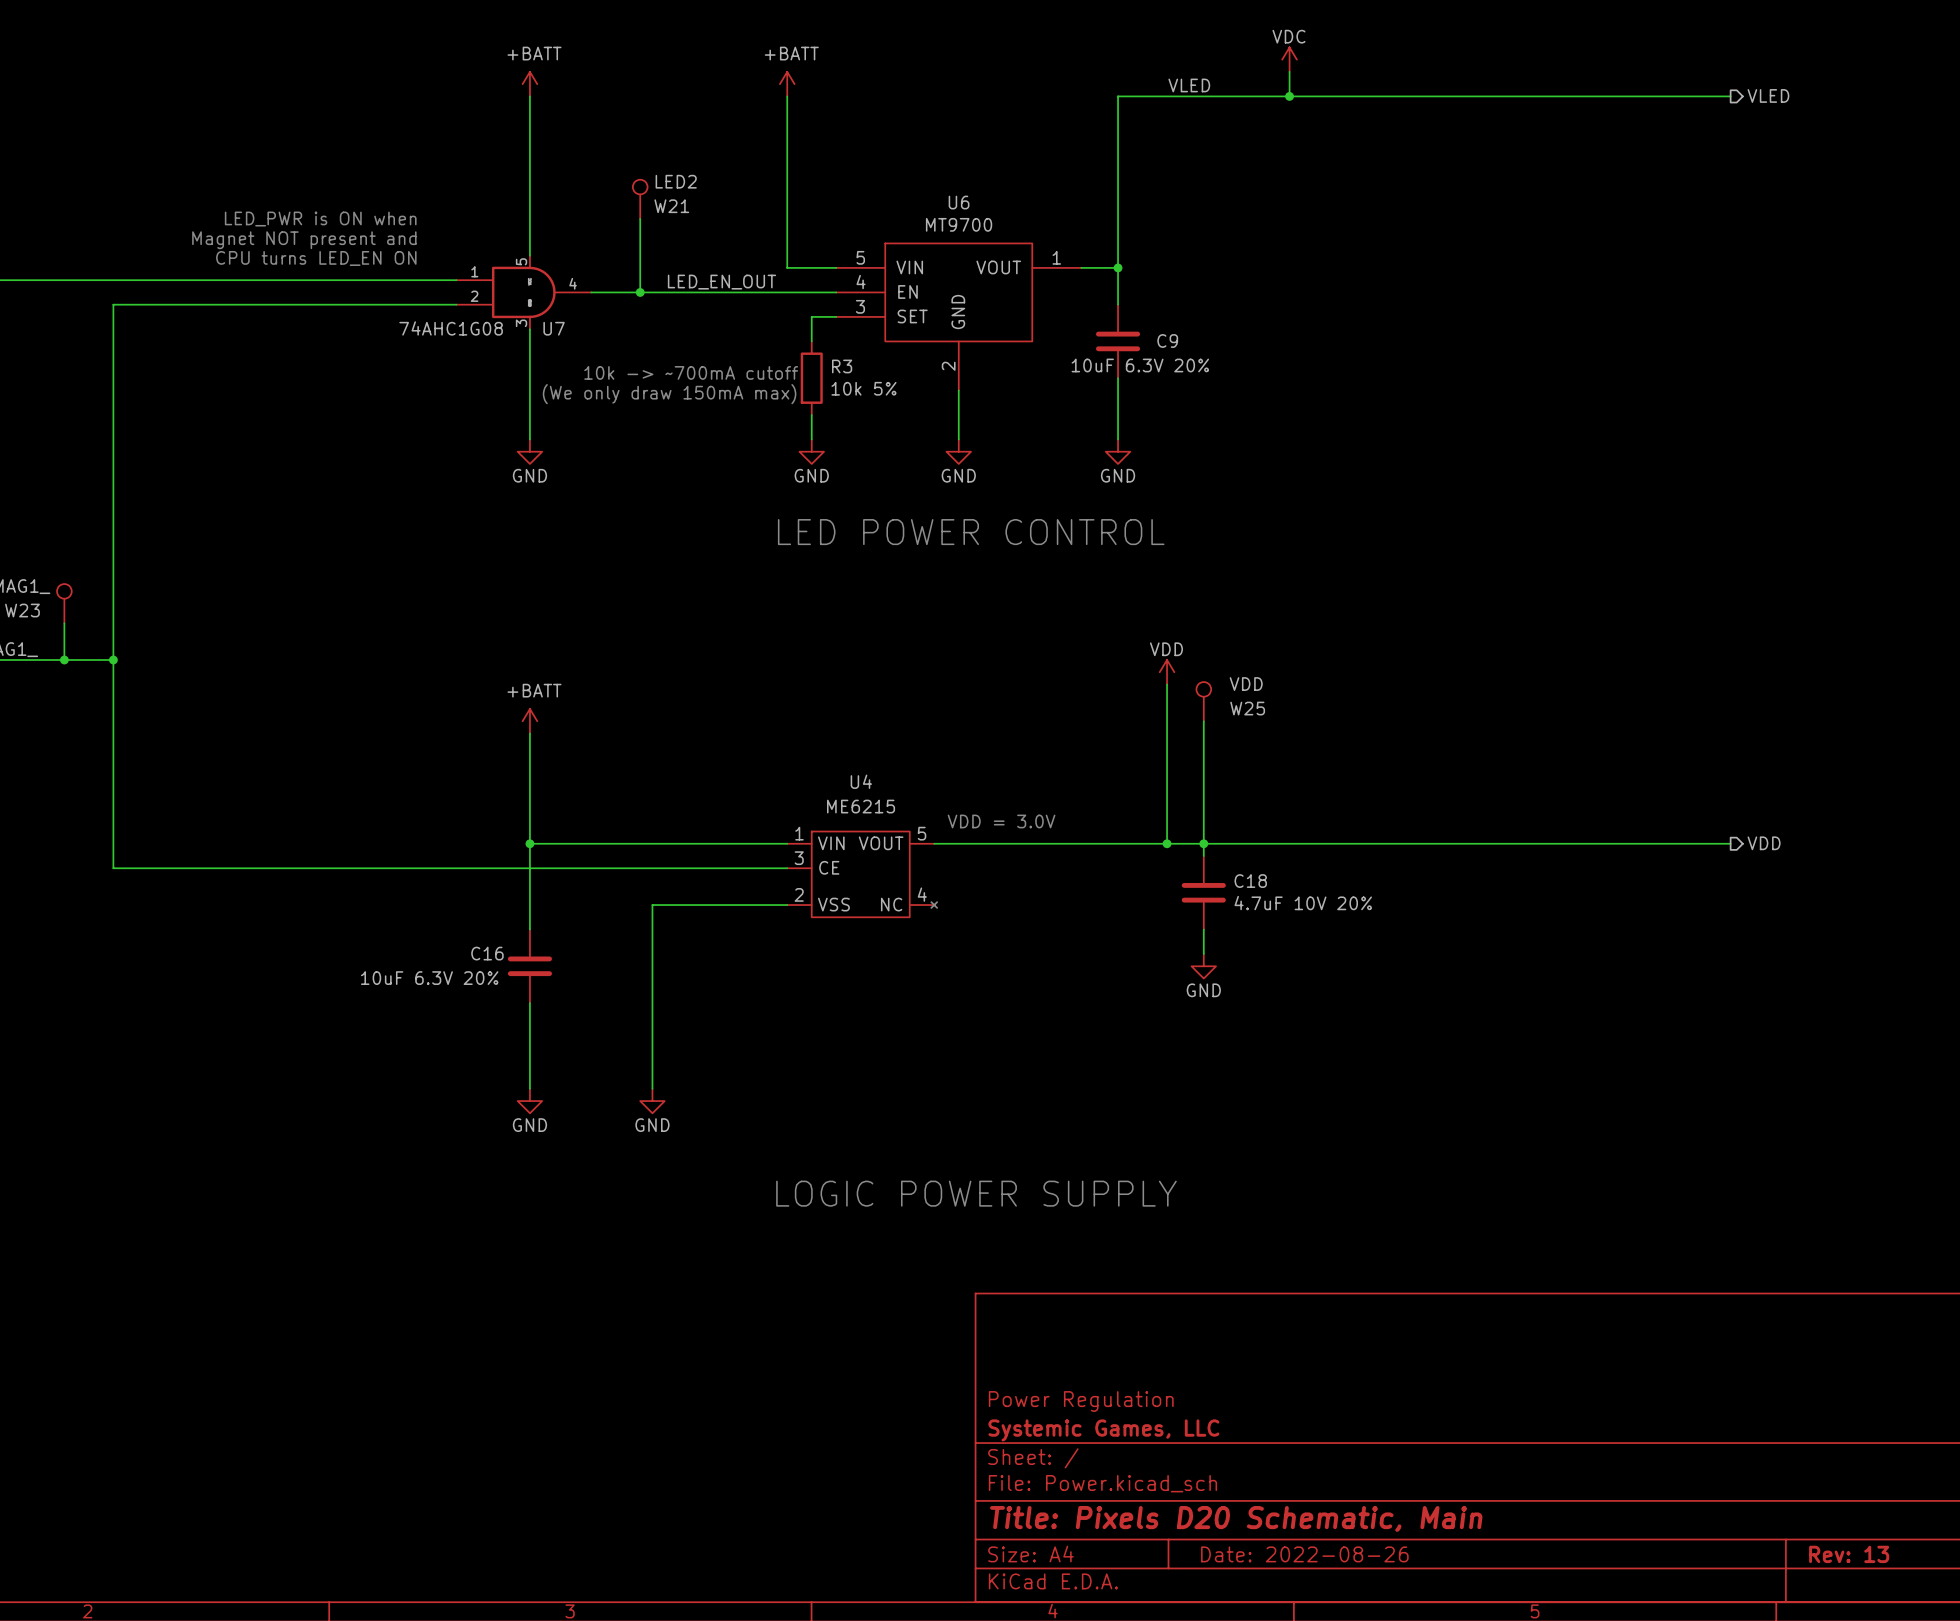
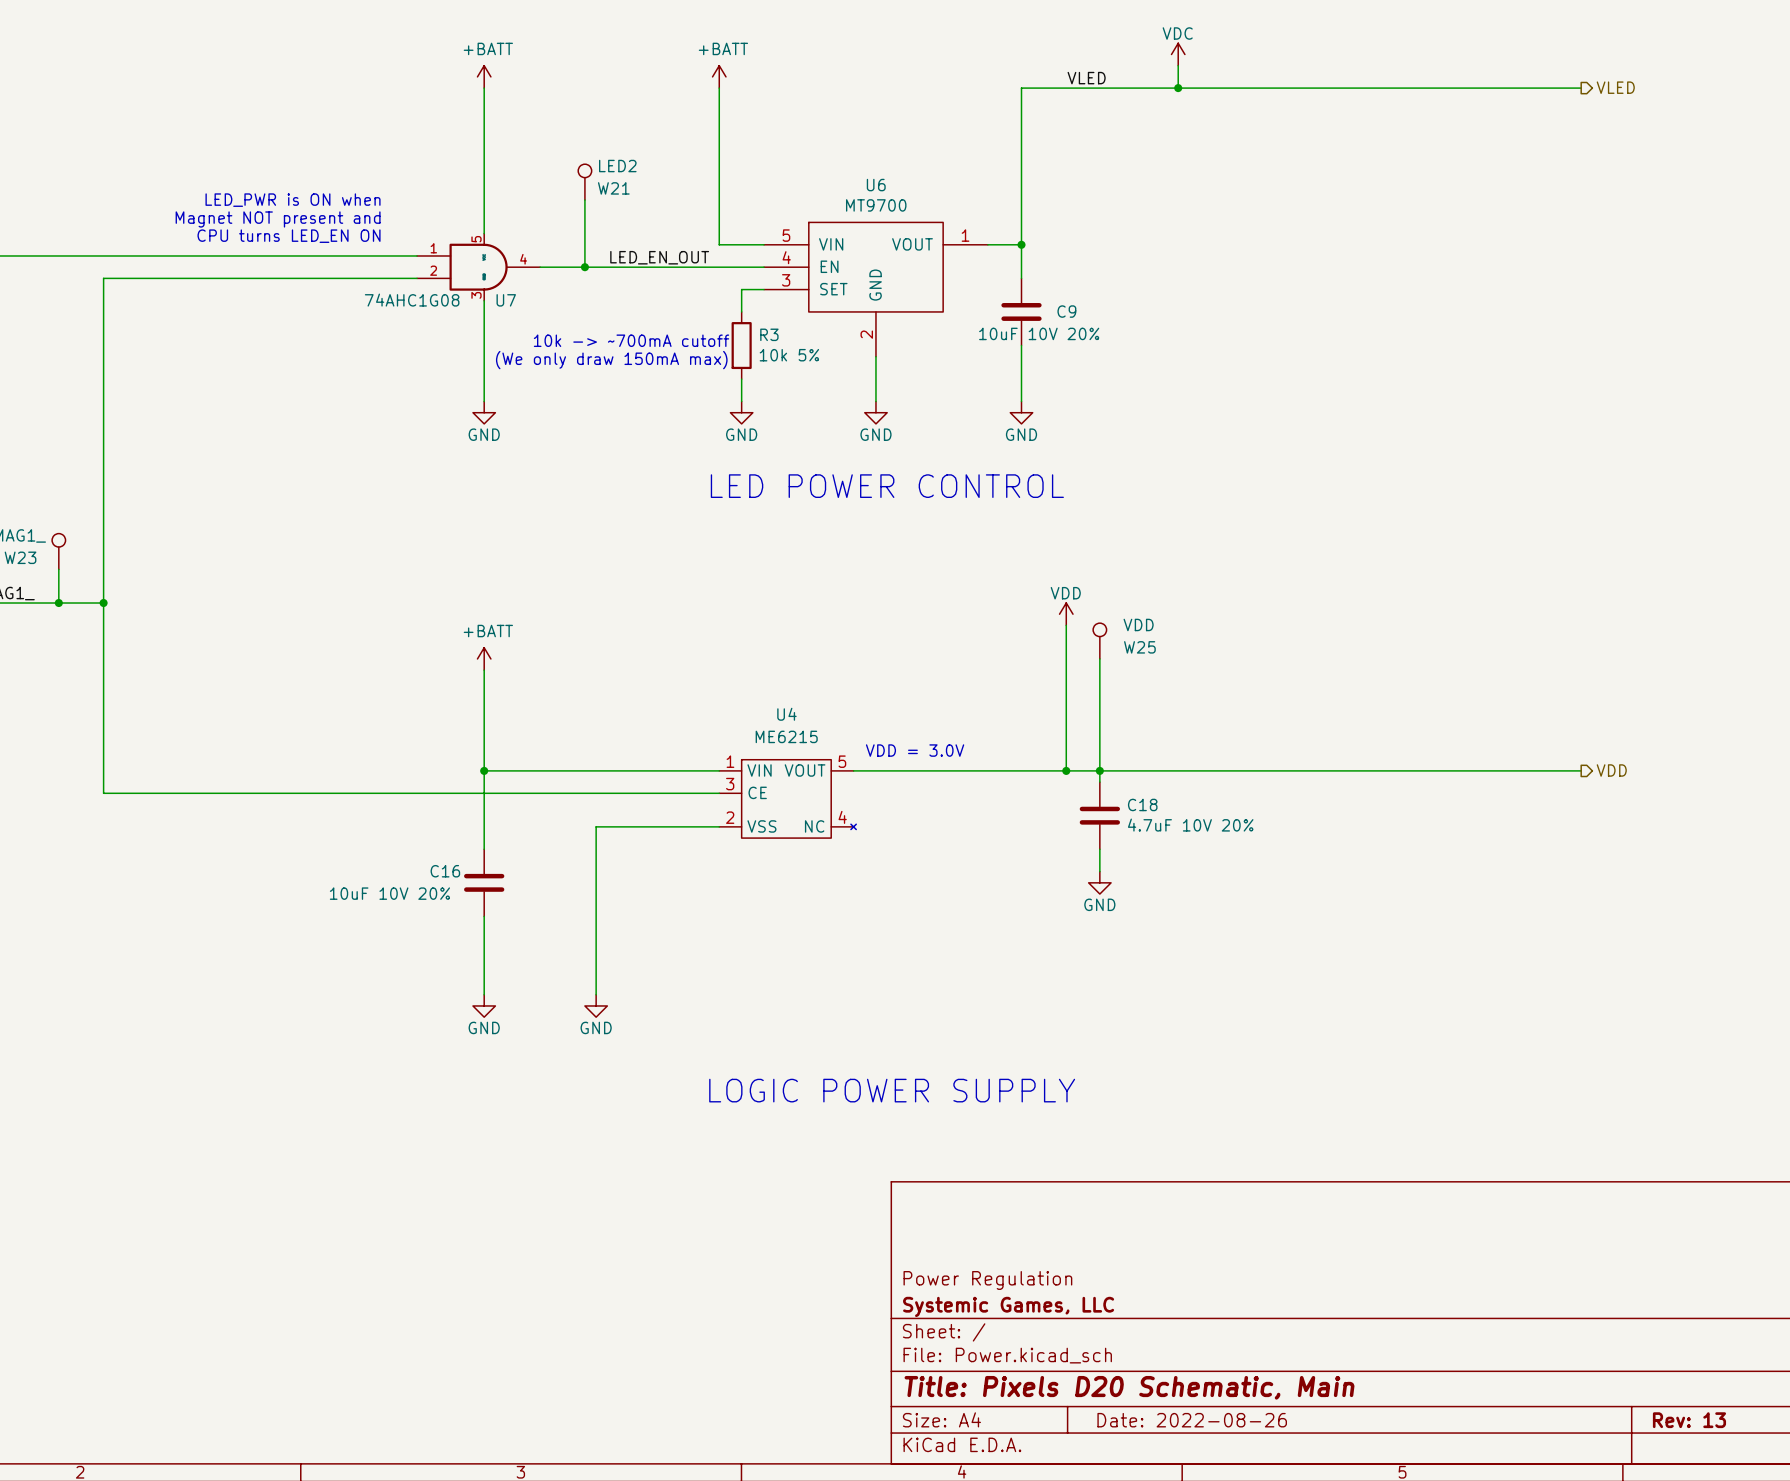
C9 value: 10uF 6.3V 20% (1140, 365) -> 10uF 10V 20% (1039, 333)
C16 value: 10uF 6.3V 20% (429, 978) -> 10uF 10V 20% (389, 893)

